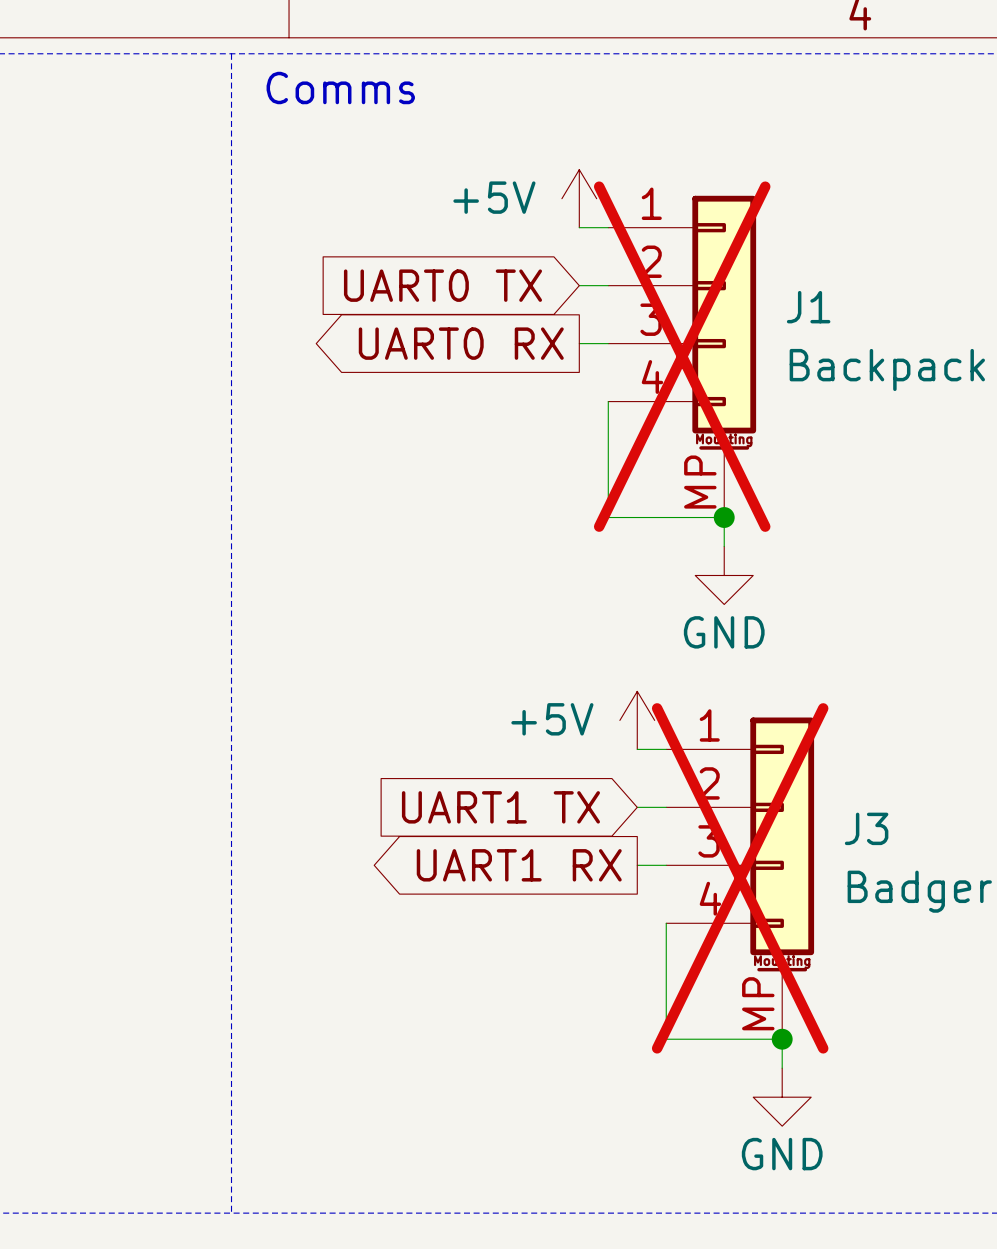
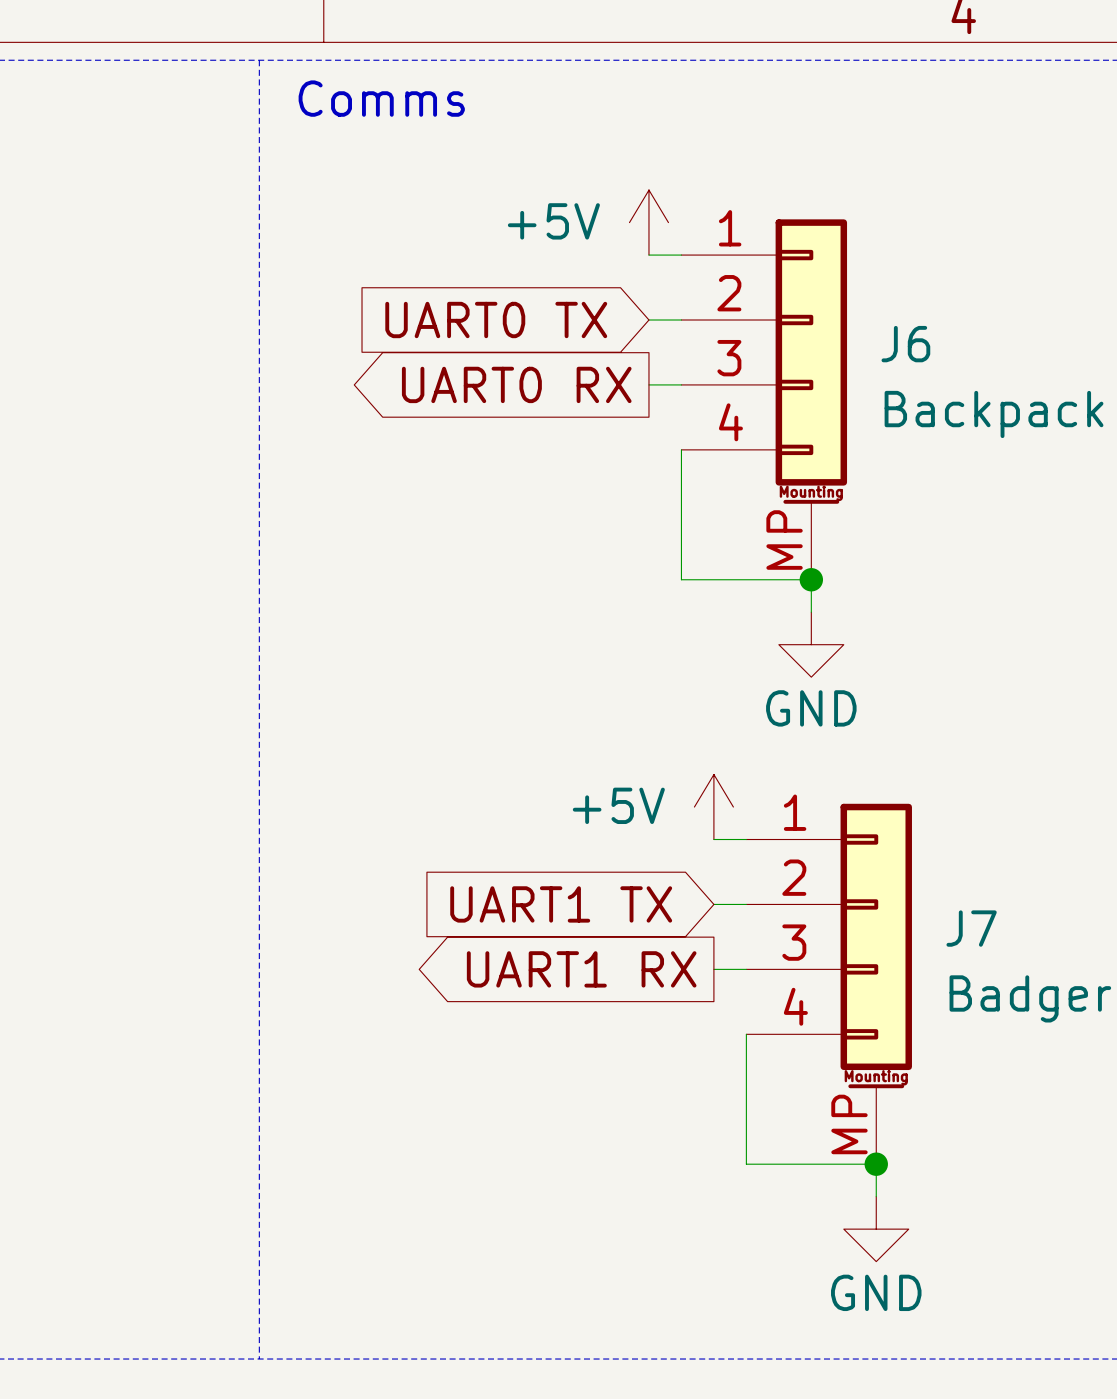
J1 name: J1 (808, 307) -> J6 (905, 344)
J1 do-not-place cross: (682, 356) -> none
J3 name: J3 (866, 828) -> J7 (971, 928)
J3 do-not-place cross: (740, 878) -> none

